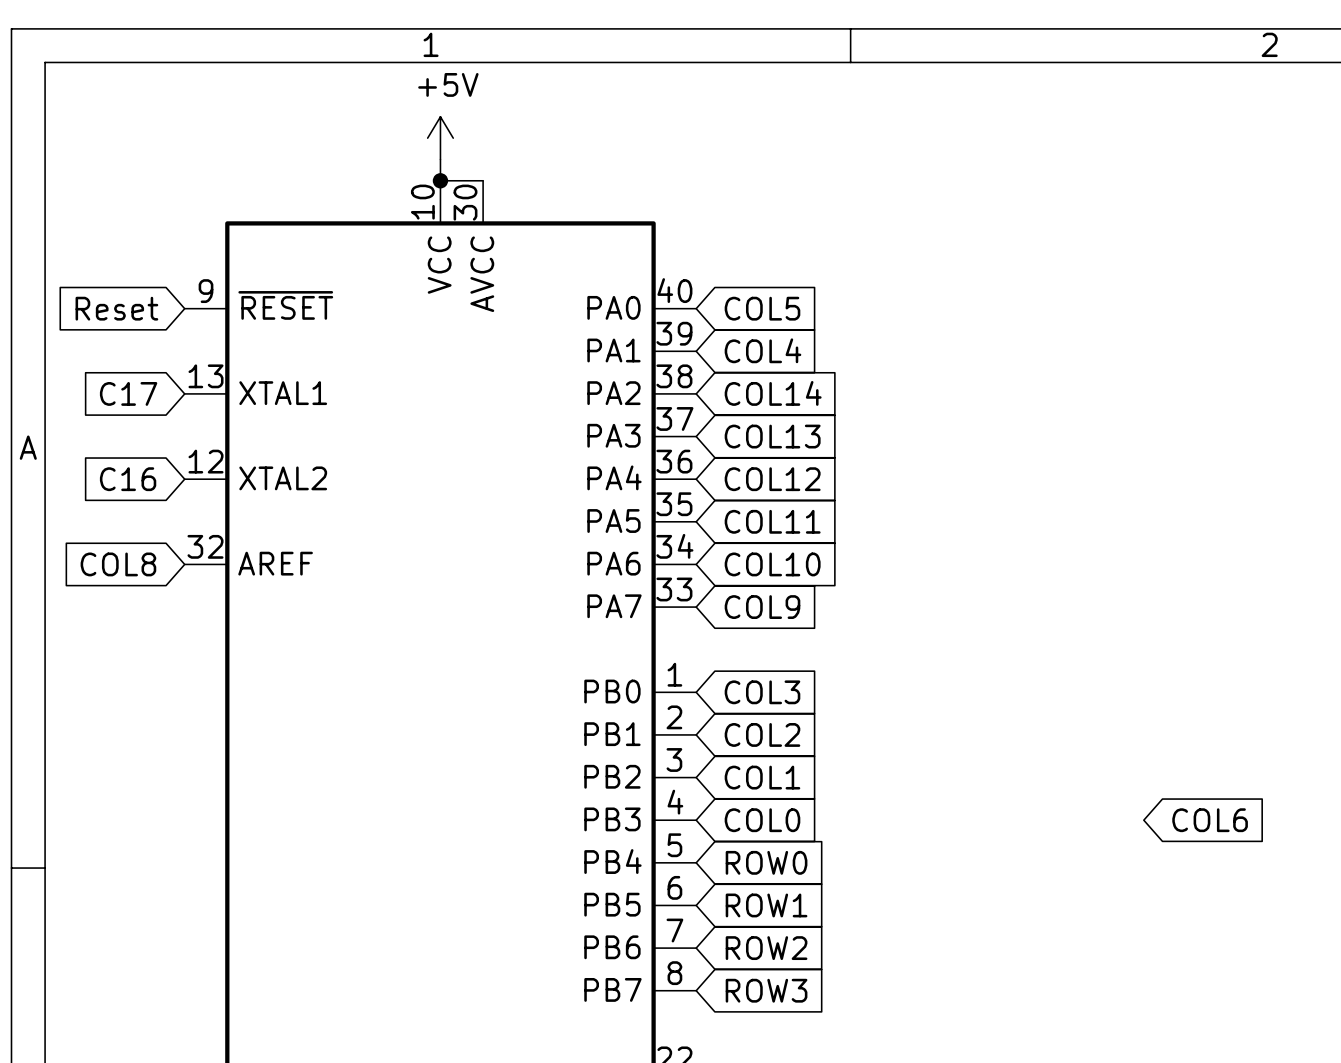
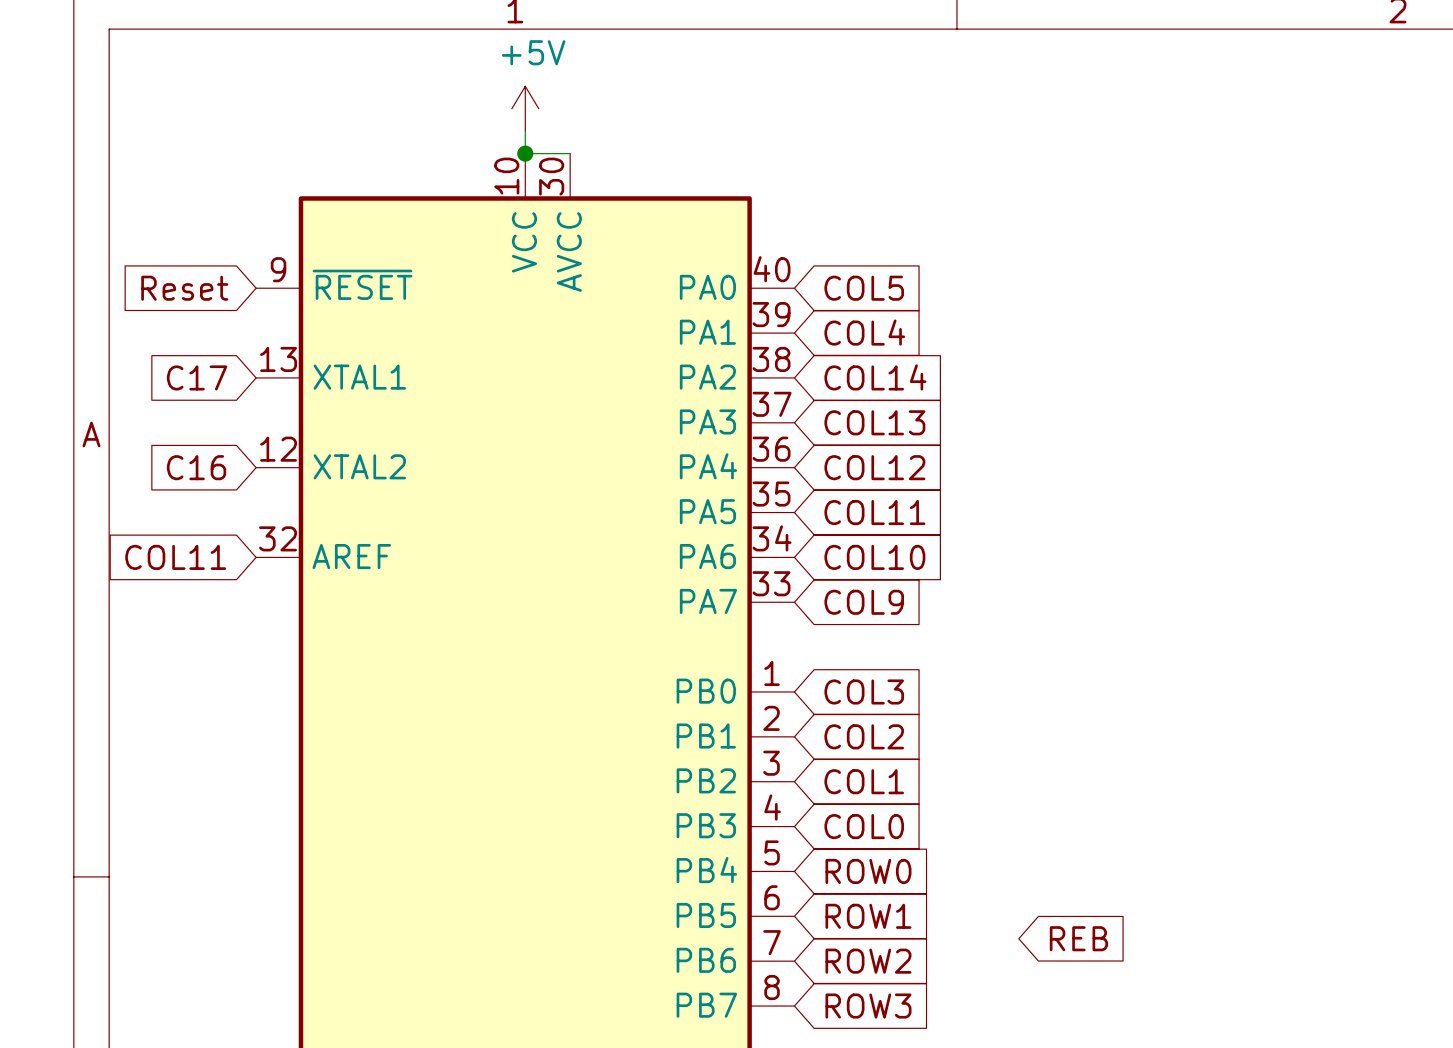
global label: COL8 (118, 564) -> COL11 (175, 557)
global label: COL6 (1210, 820) -> none
global label: none -> REB (1078, 938)

